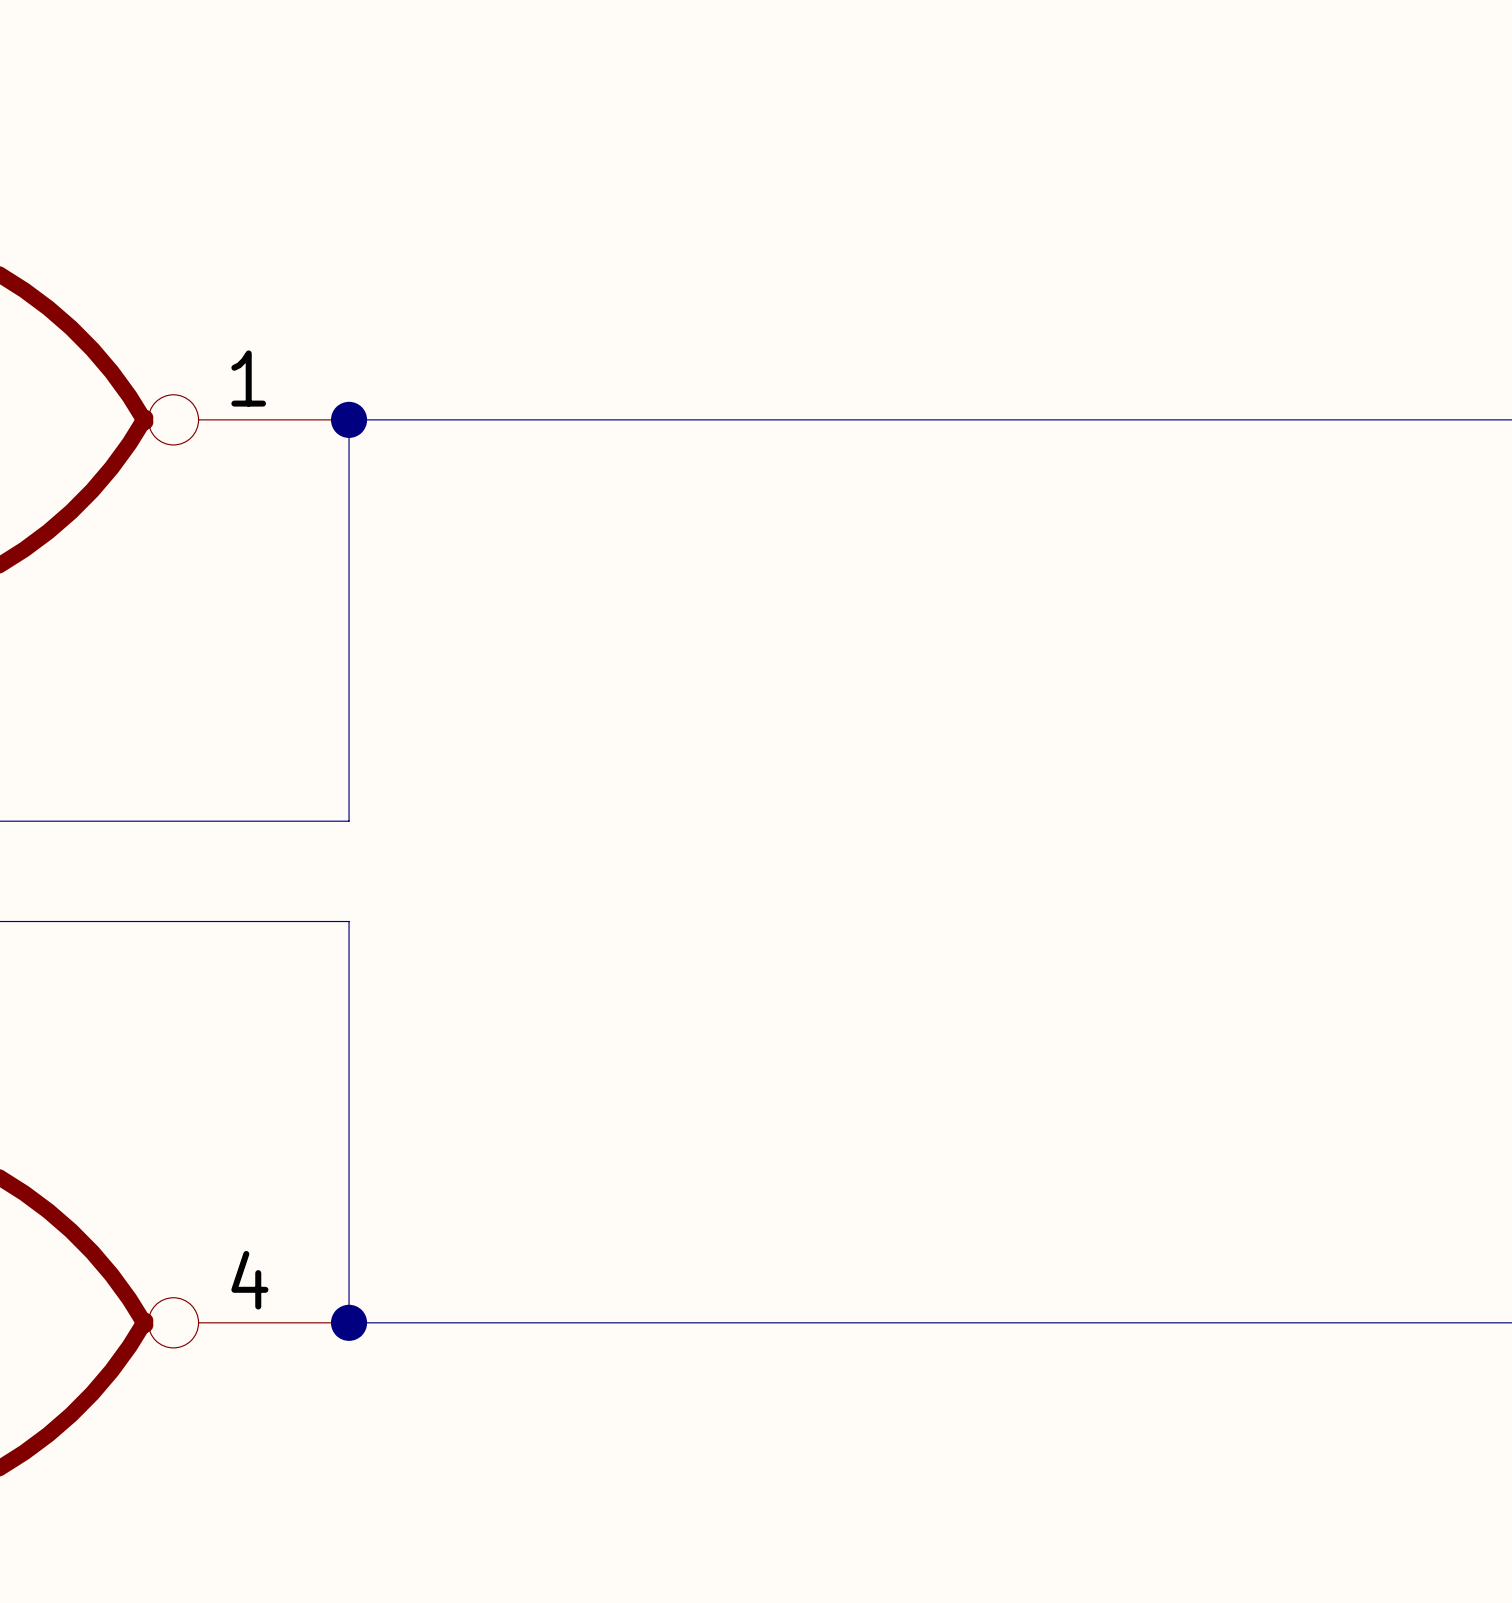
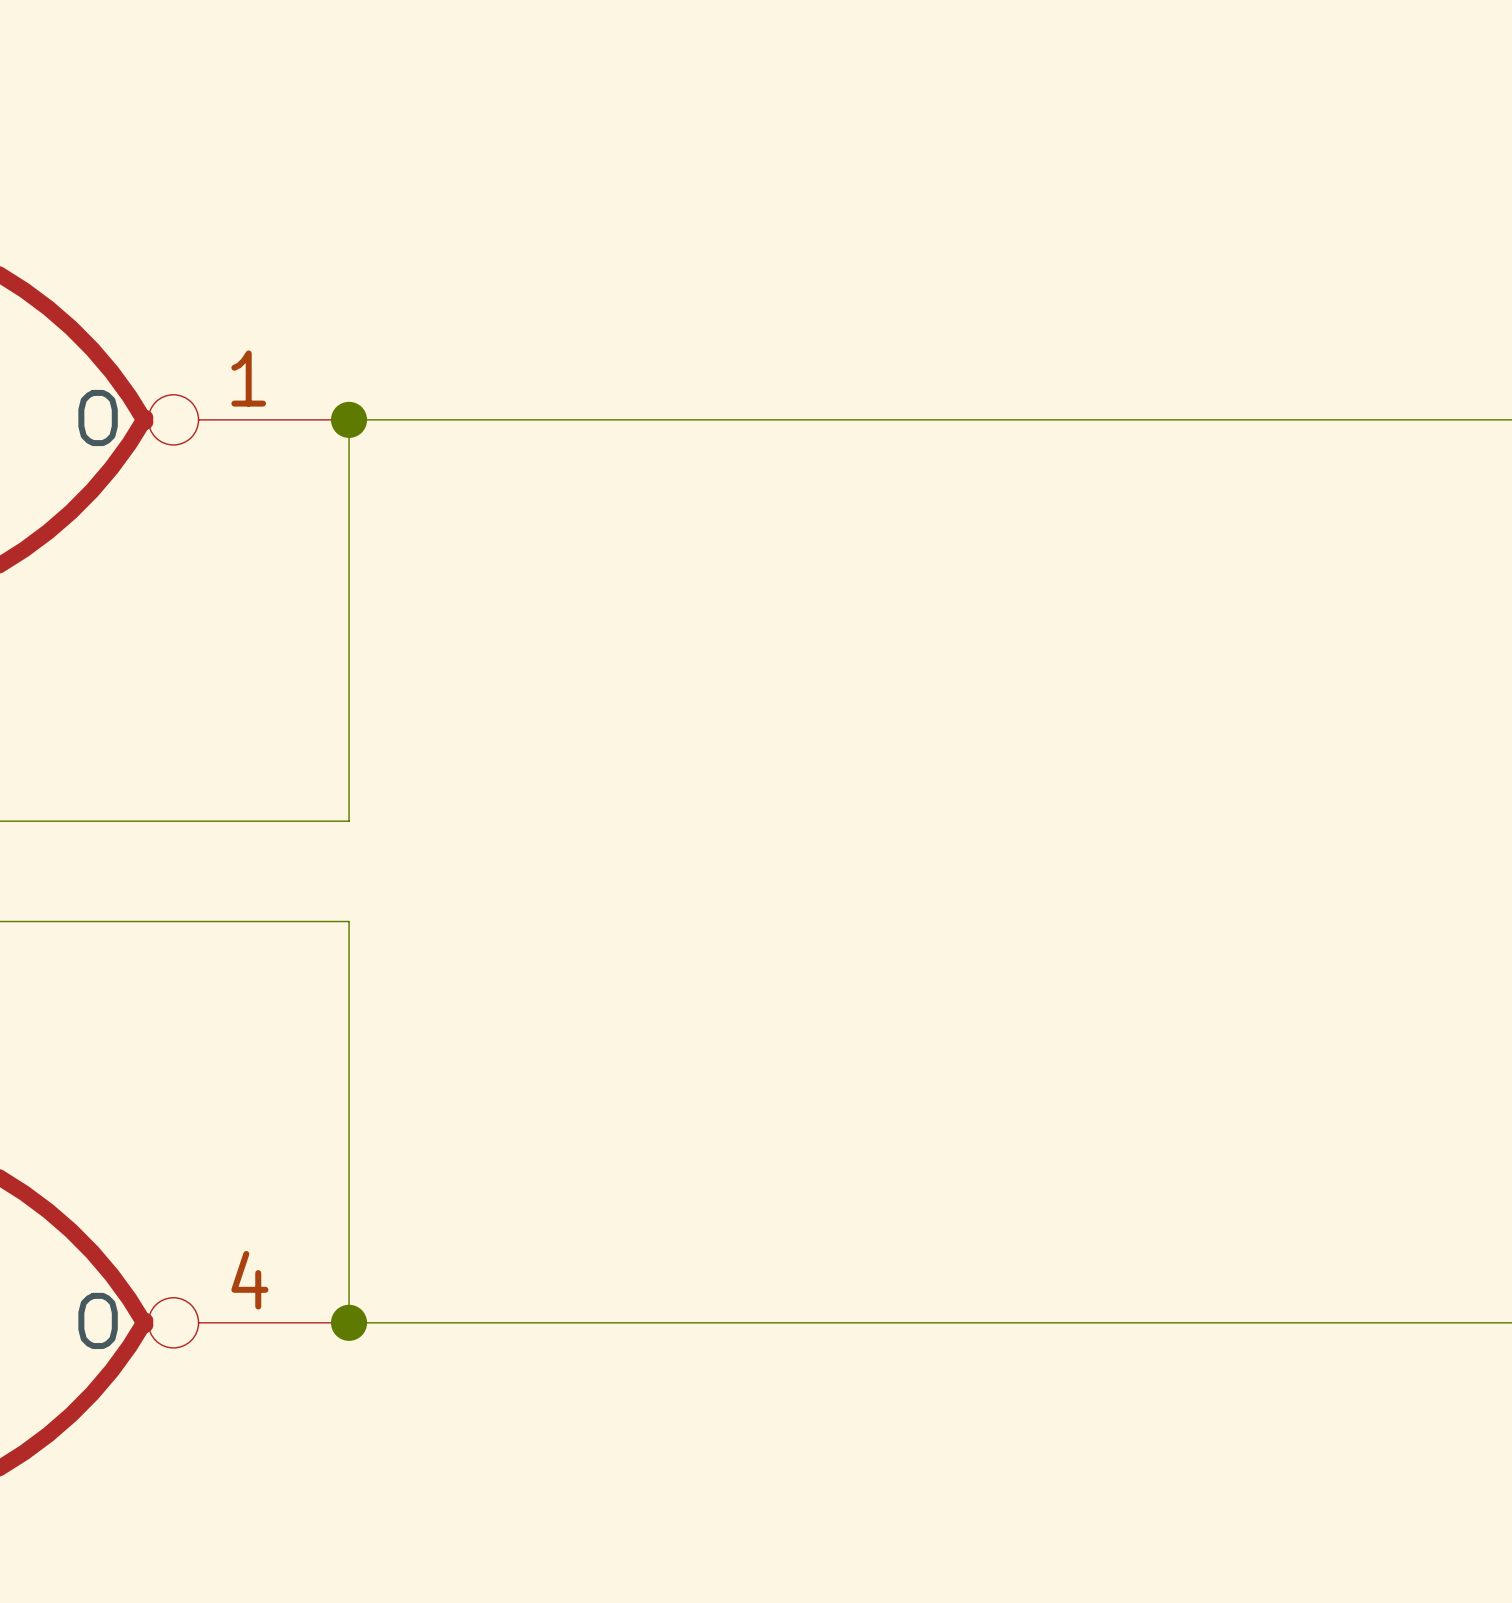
part pin name: none -> O (98, 418)
part pin name: none -> O (98, 1320)

